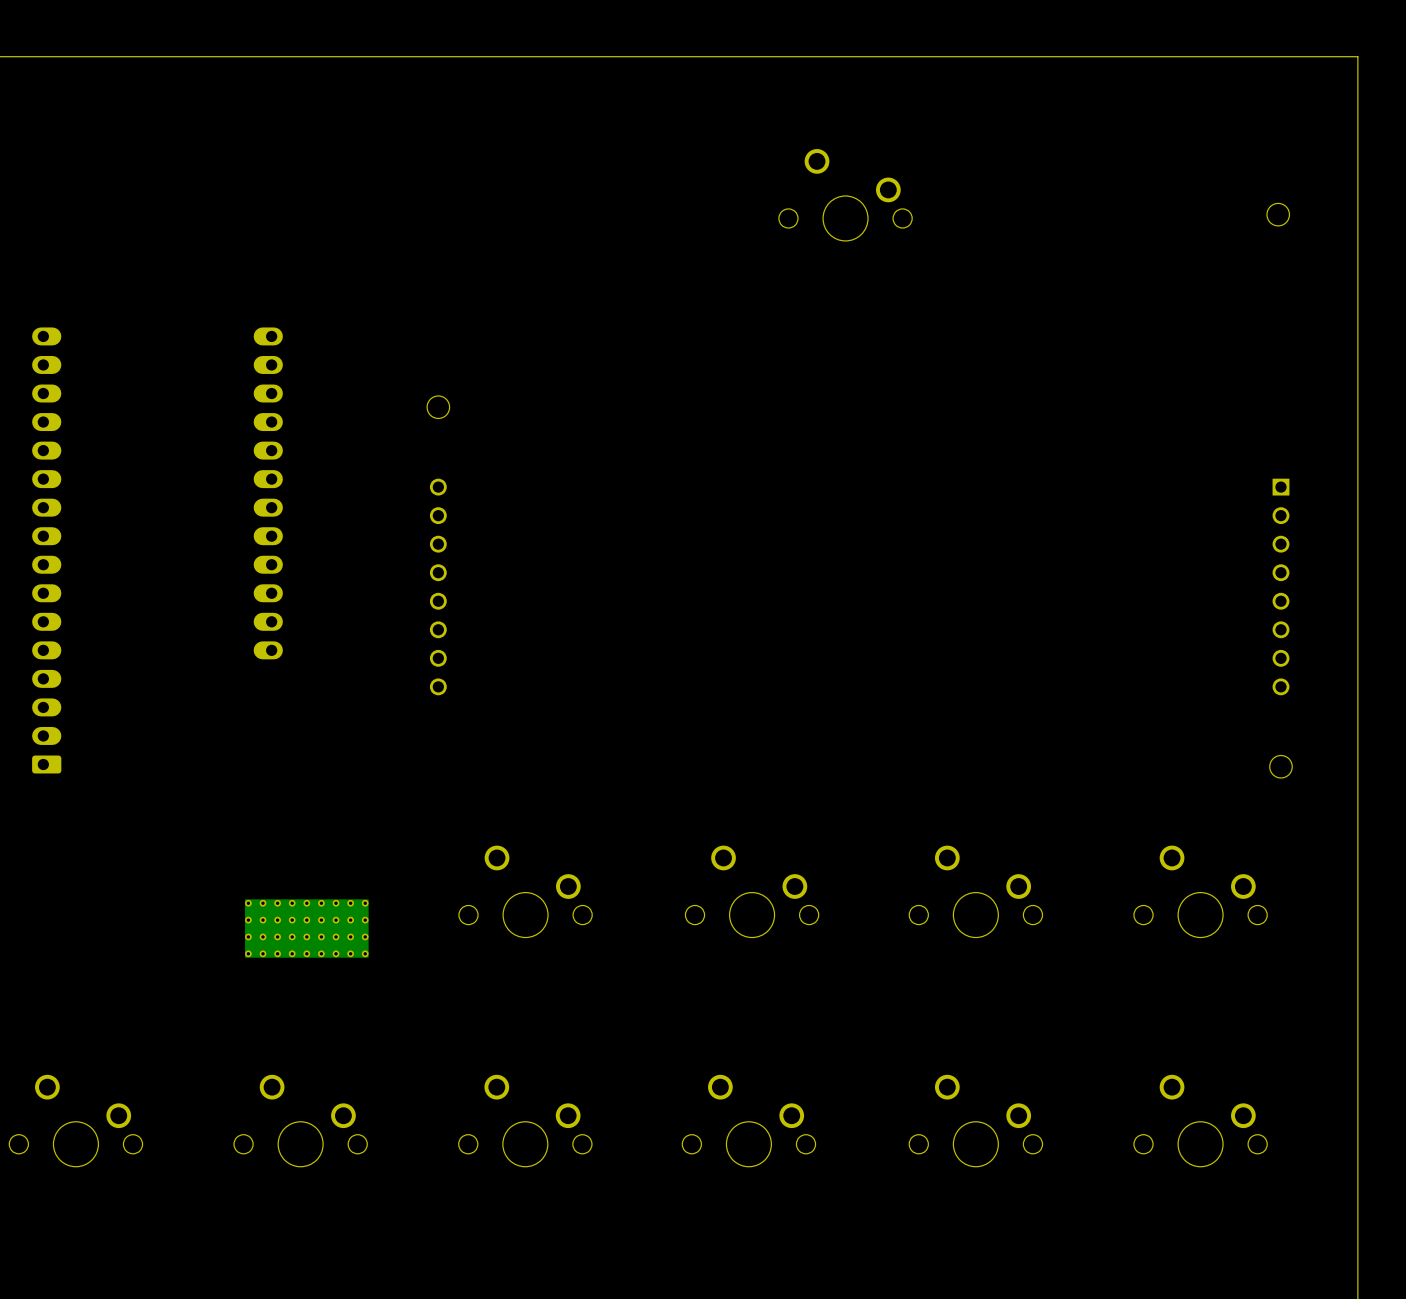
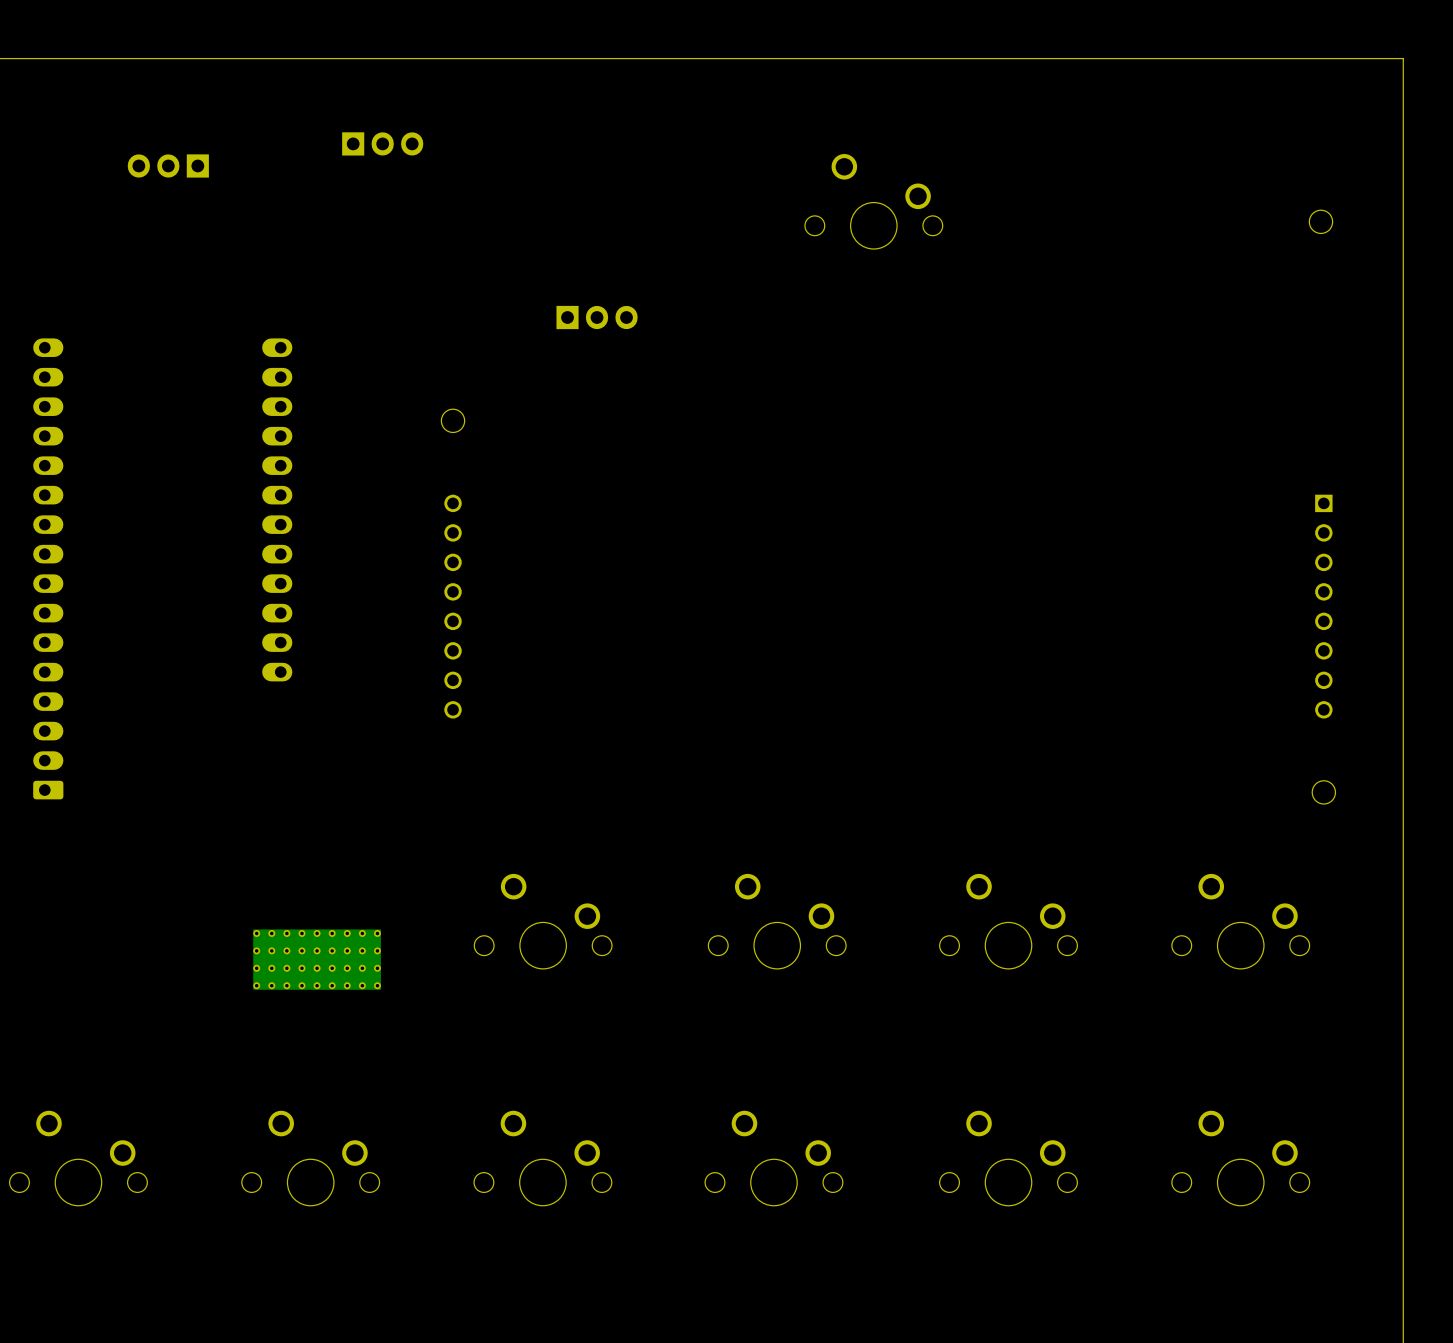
part: none -> (382, 143)
part: none -> (168, 165)
part: none -> (597, 317)

